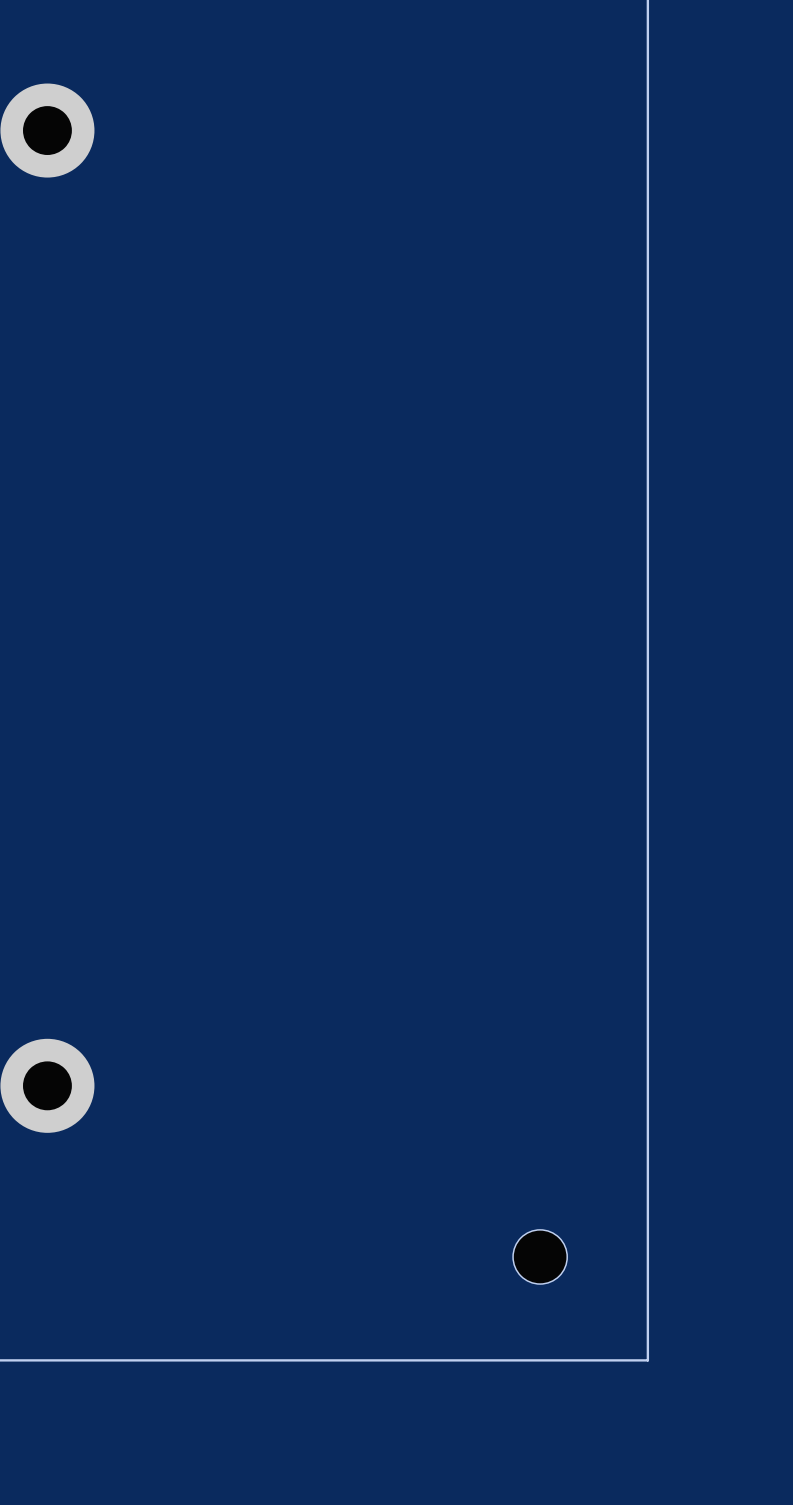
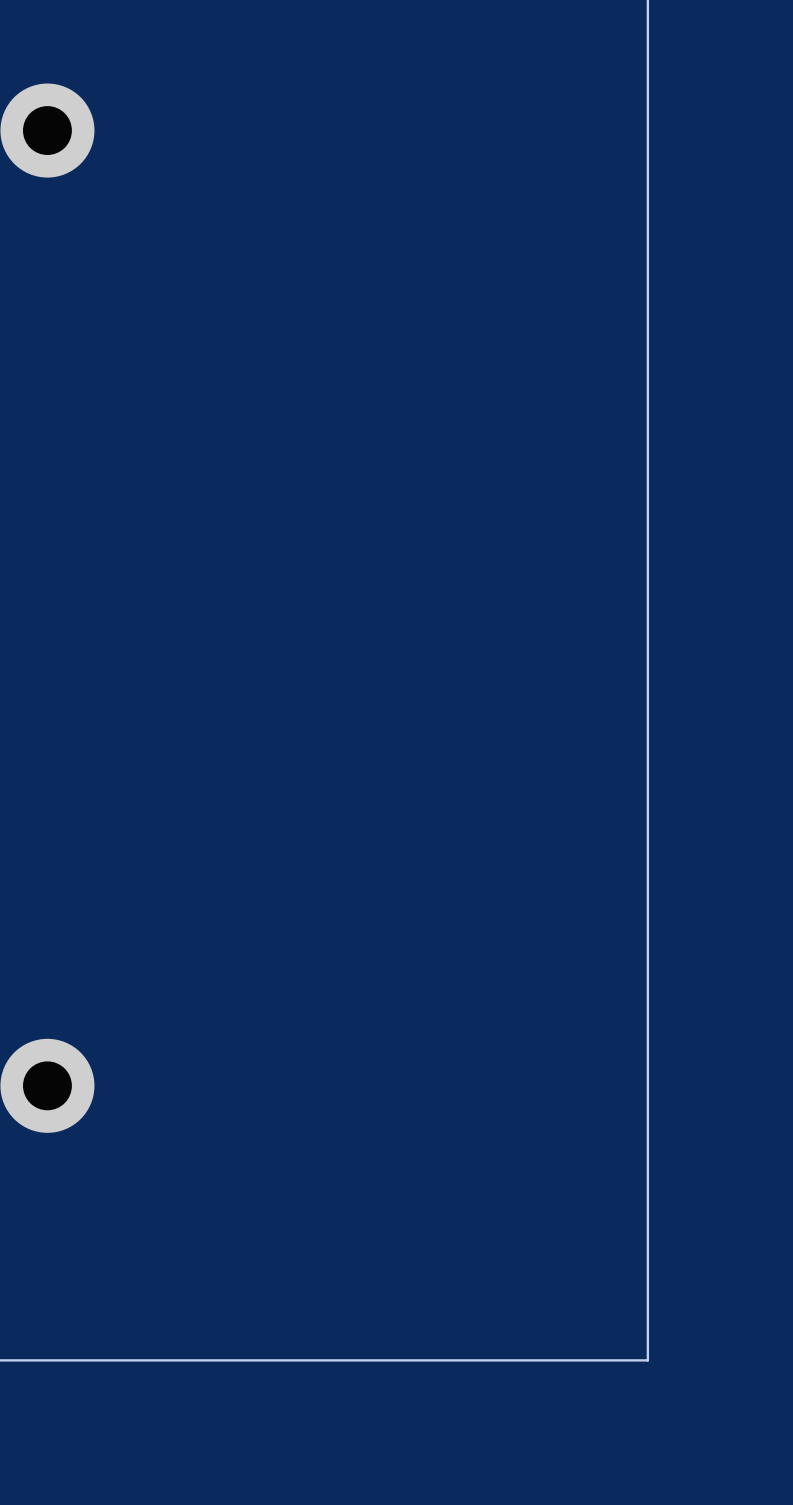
part: (540, 1256) -> none

